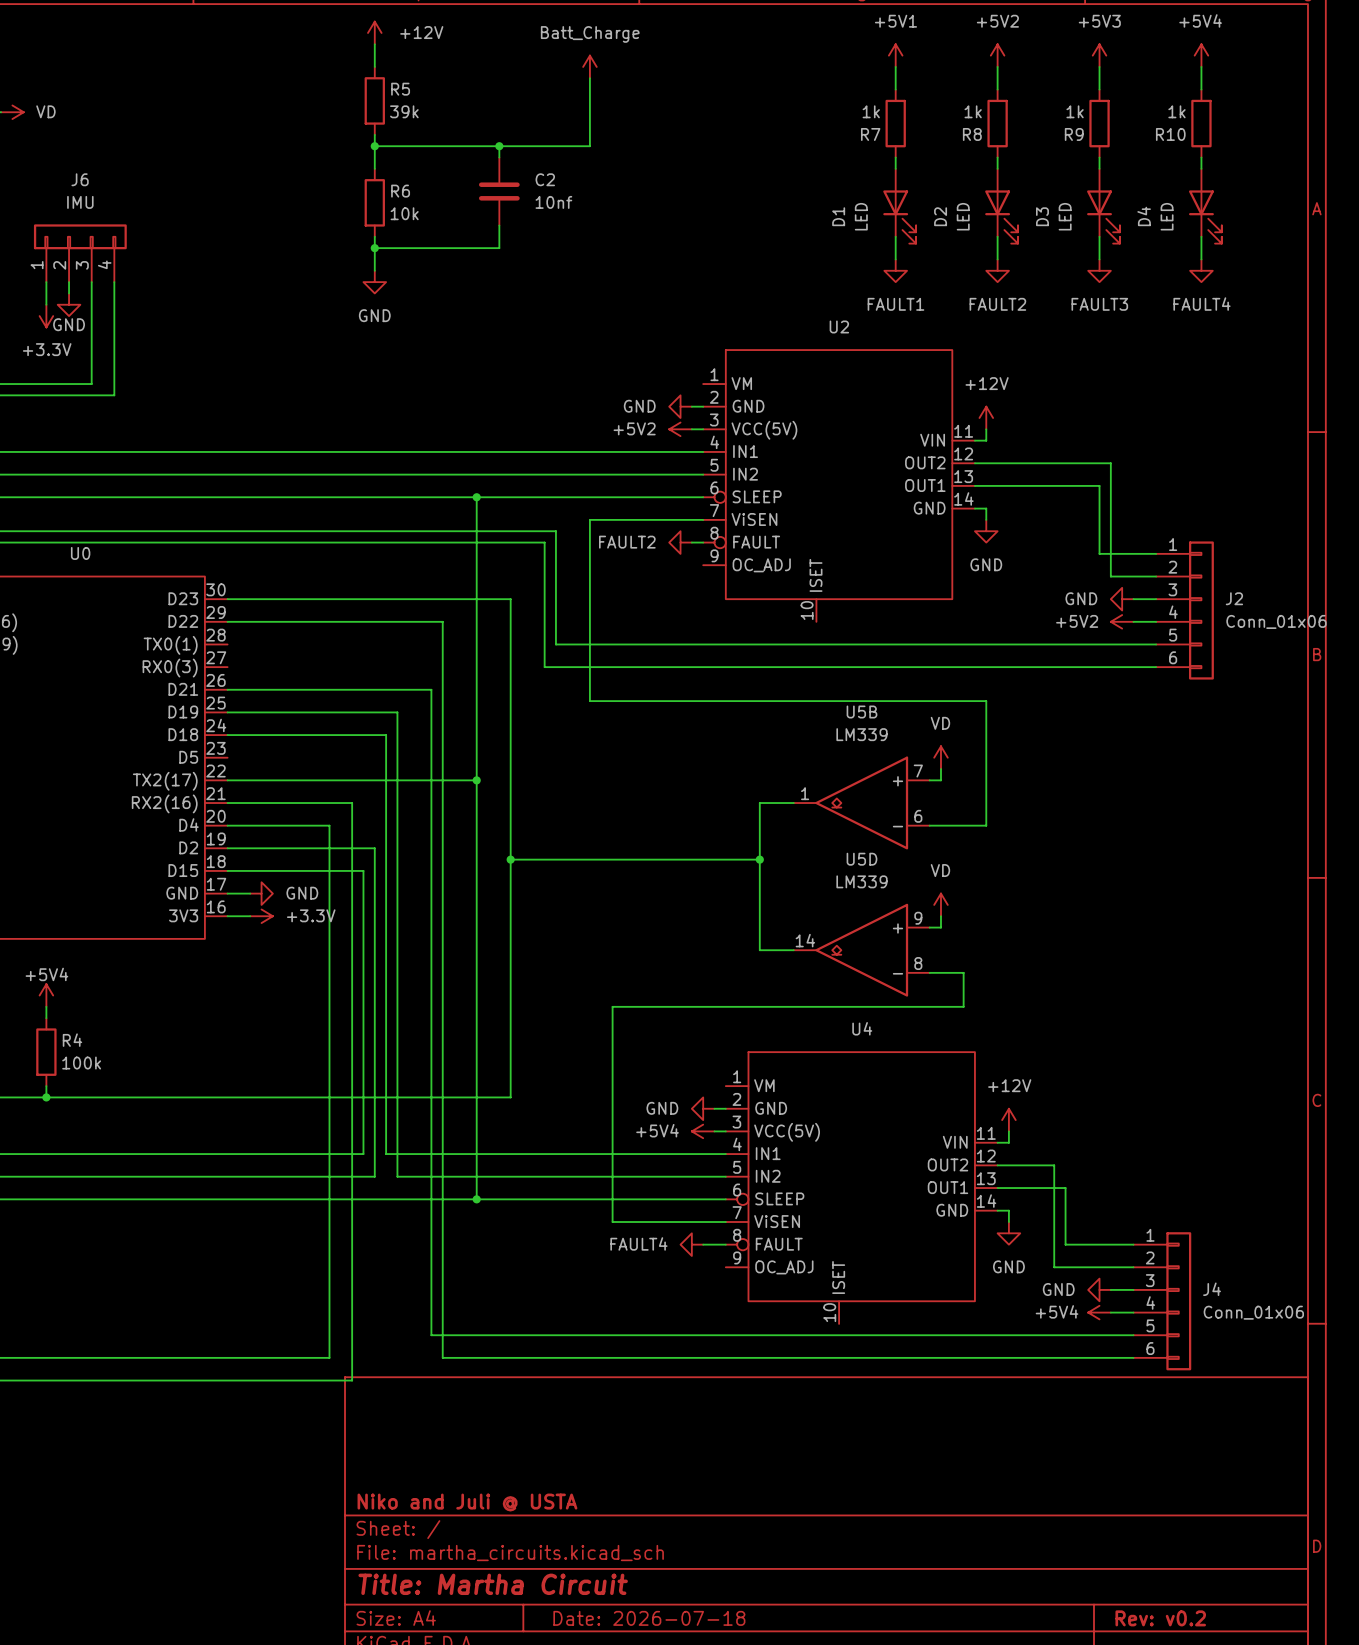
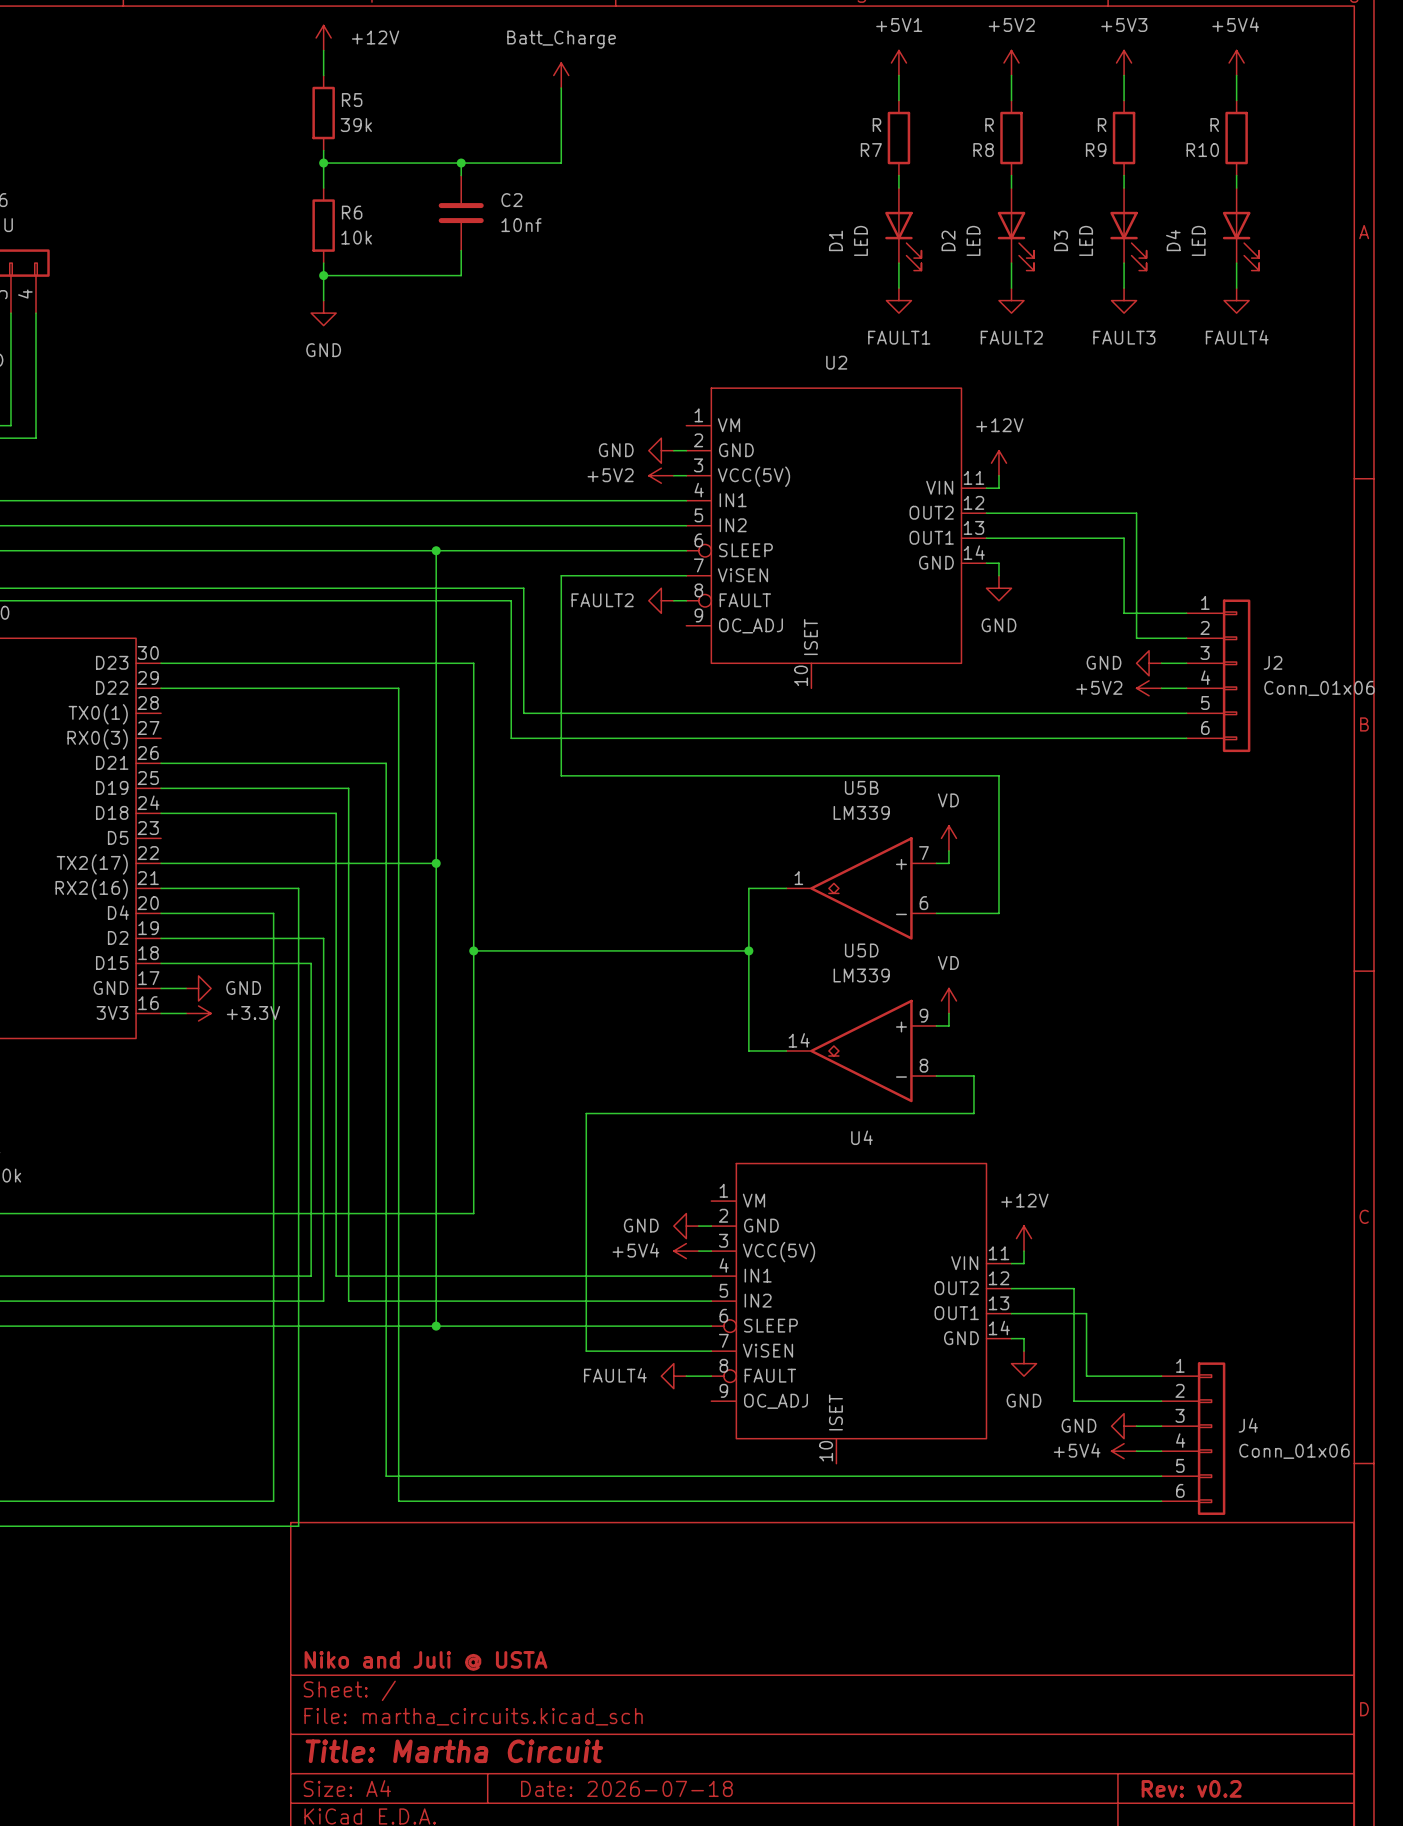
R7 value: 1k (871, 111) -> R (876, 125)
R8 value: 1k (973, 111) -> R (989, 125)
R9 value: 1k (1075, 111) -> R (1102, 125)
R10 value: 1k (1176, 111) -> R (1214, 125)

